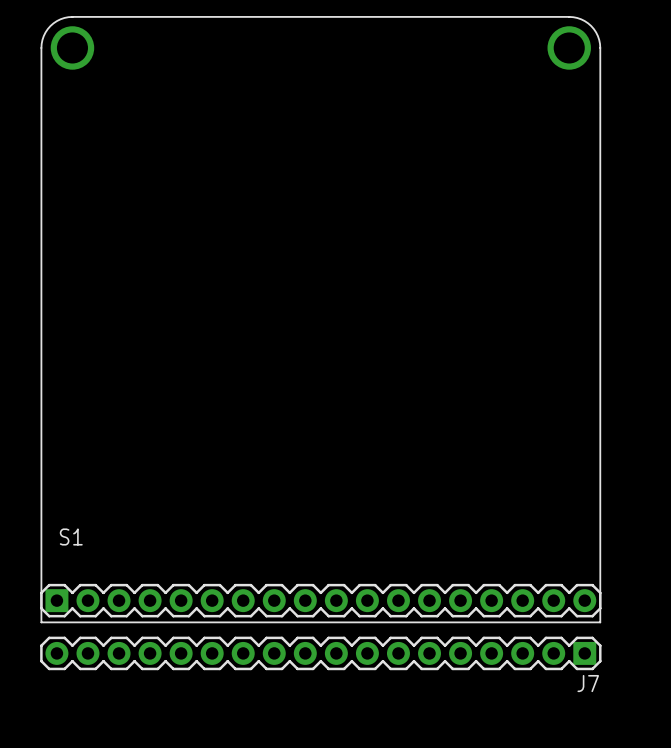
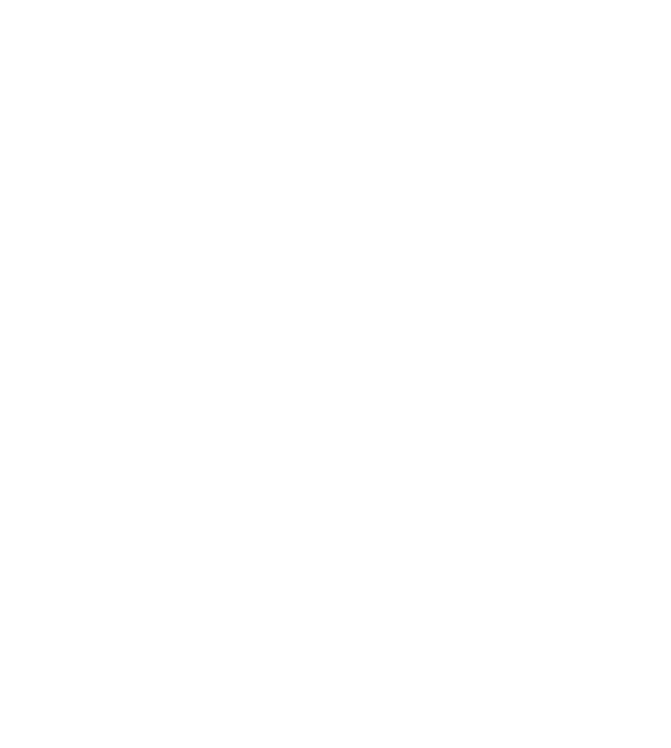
S1: (320, 319) -> none
J7: (320, 653) -> none

